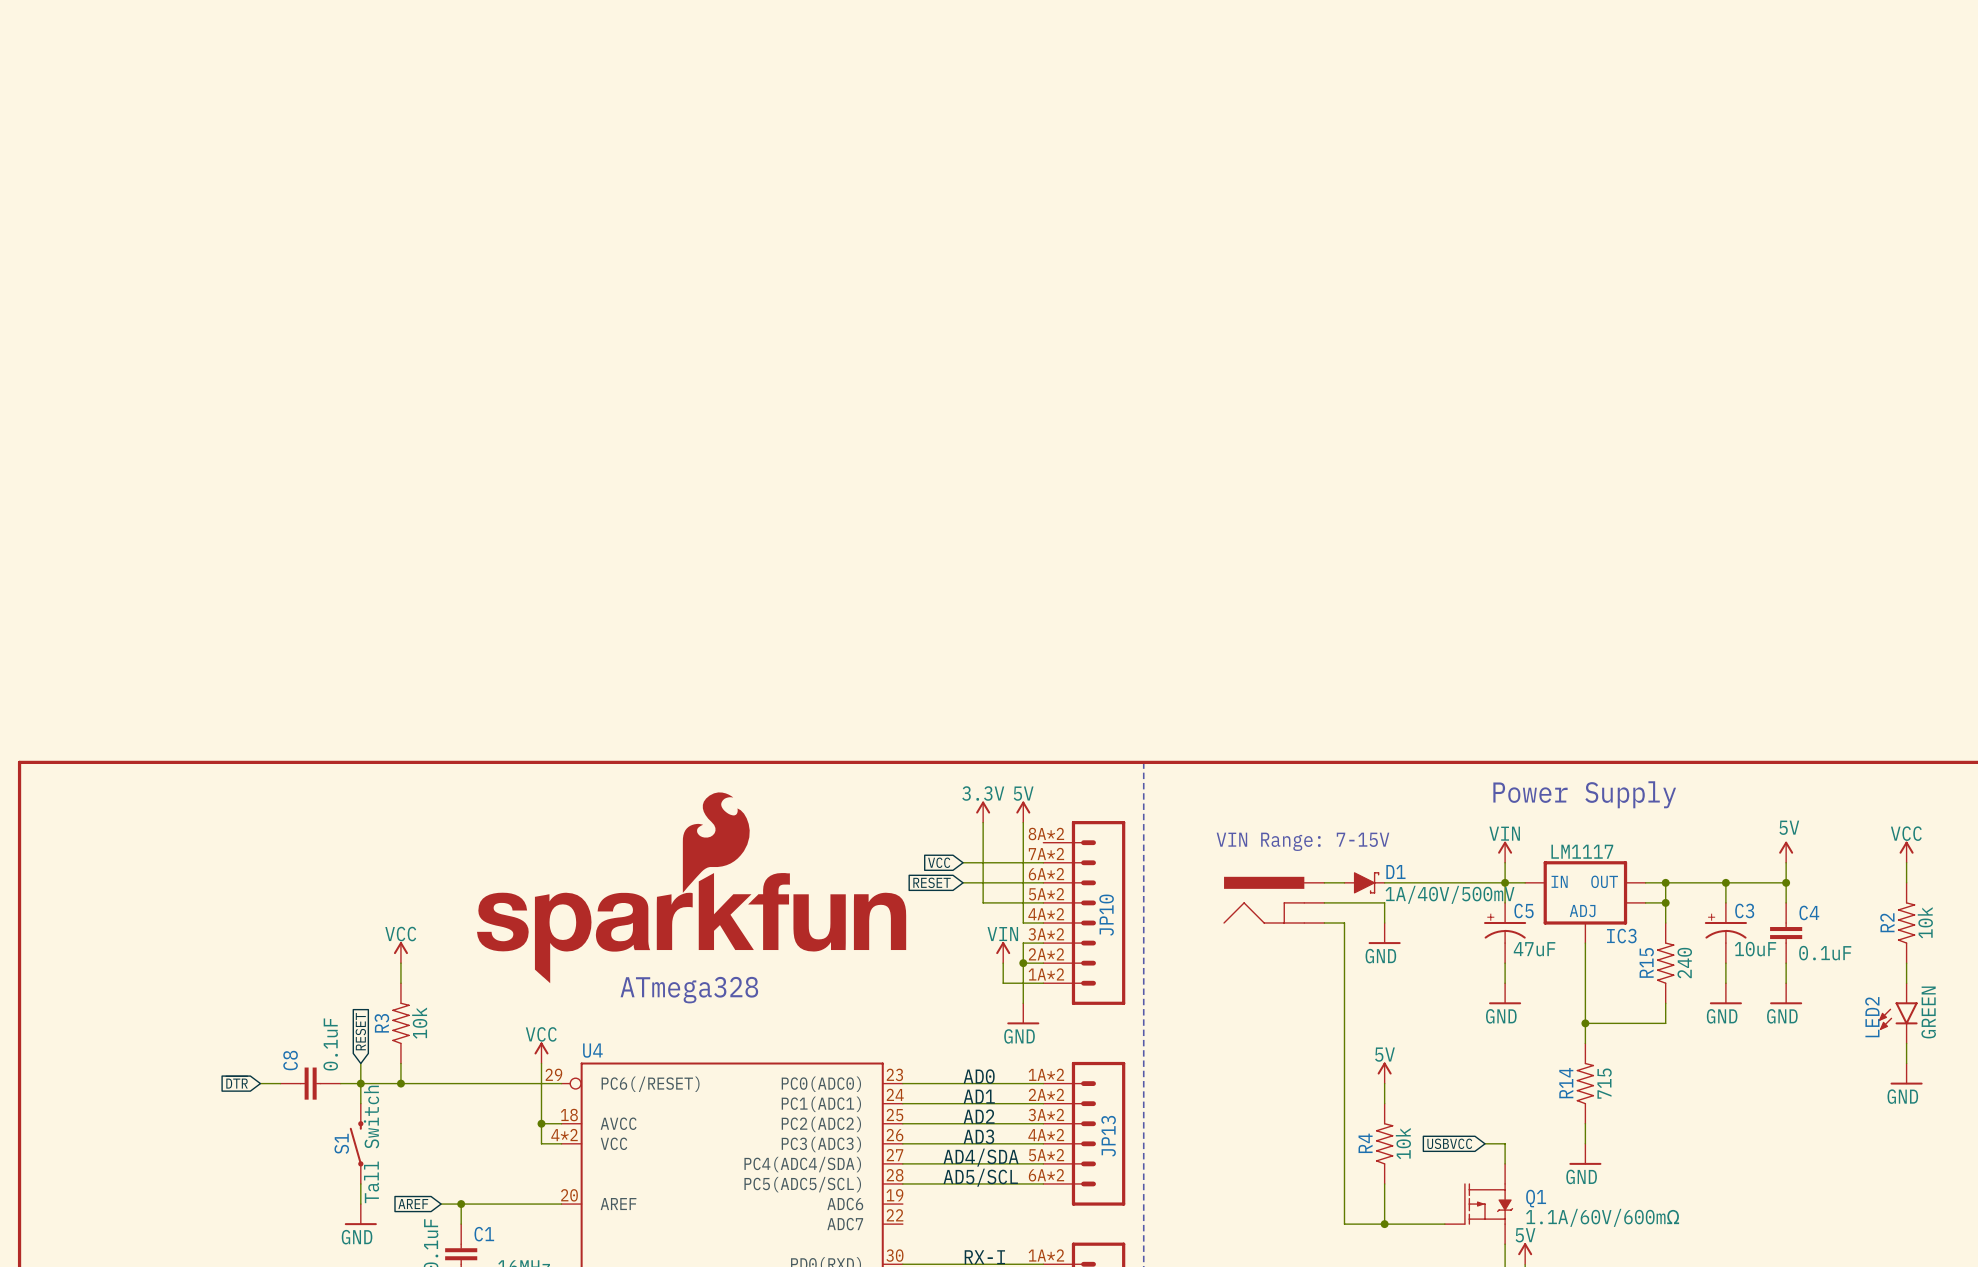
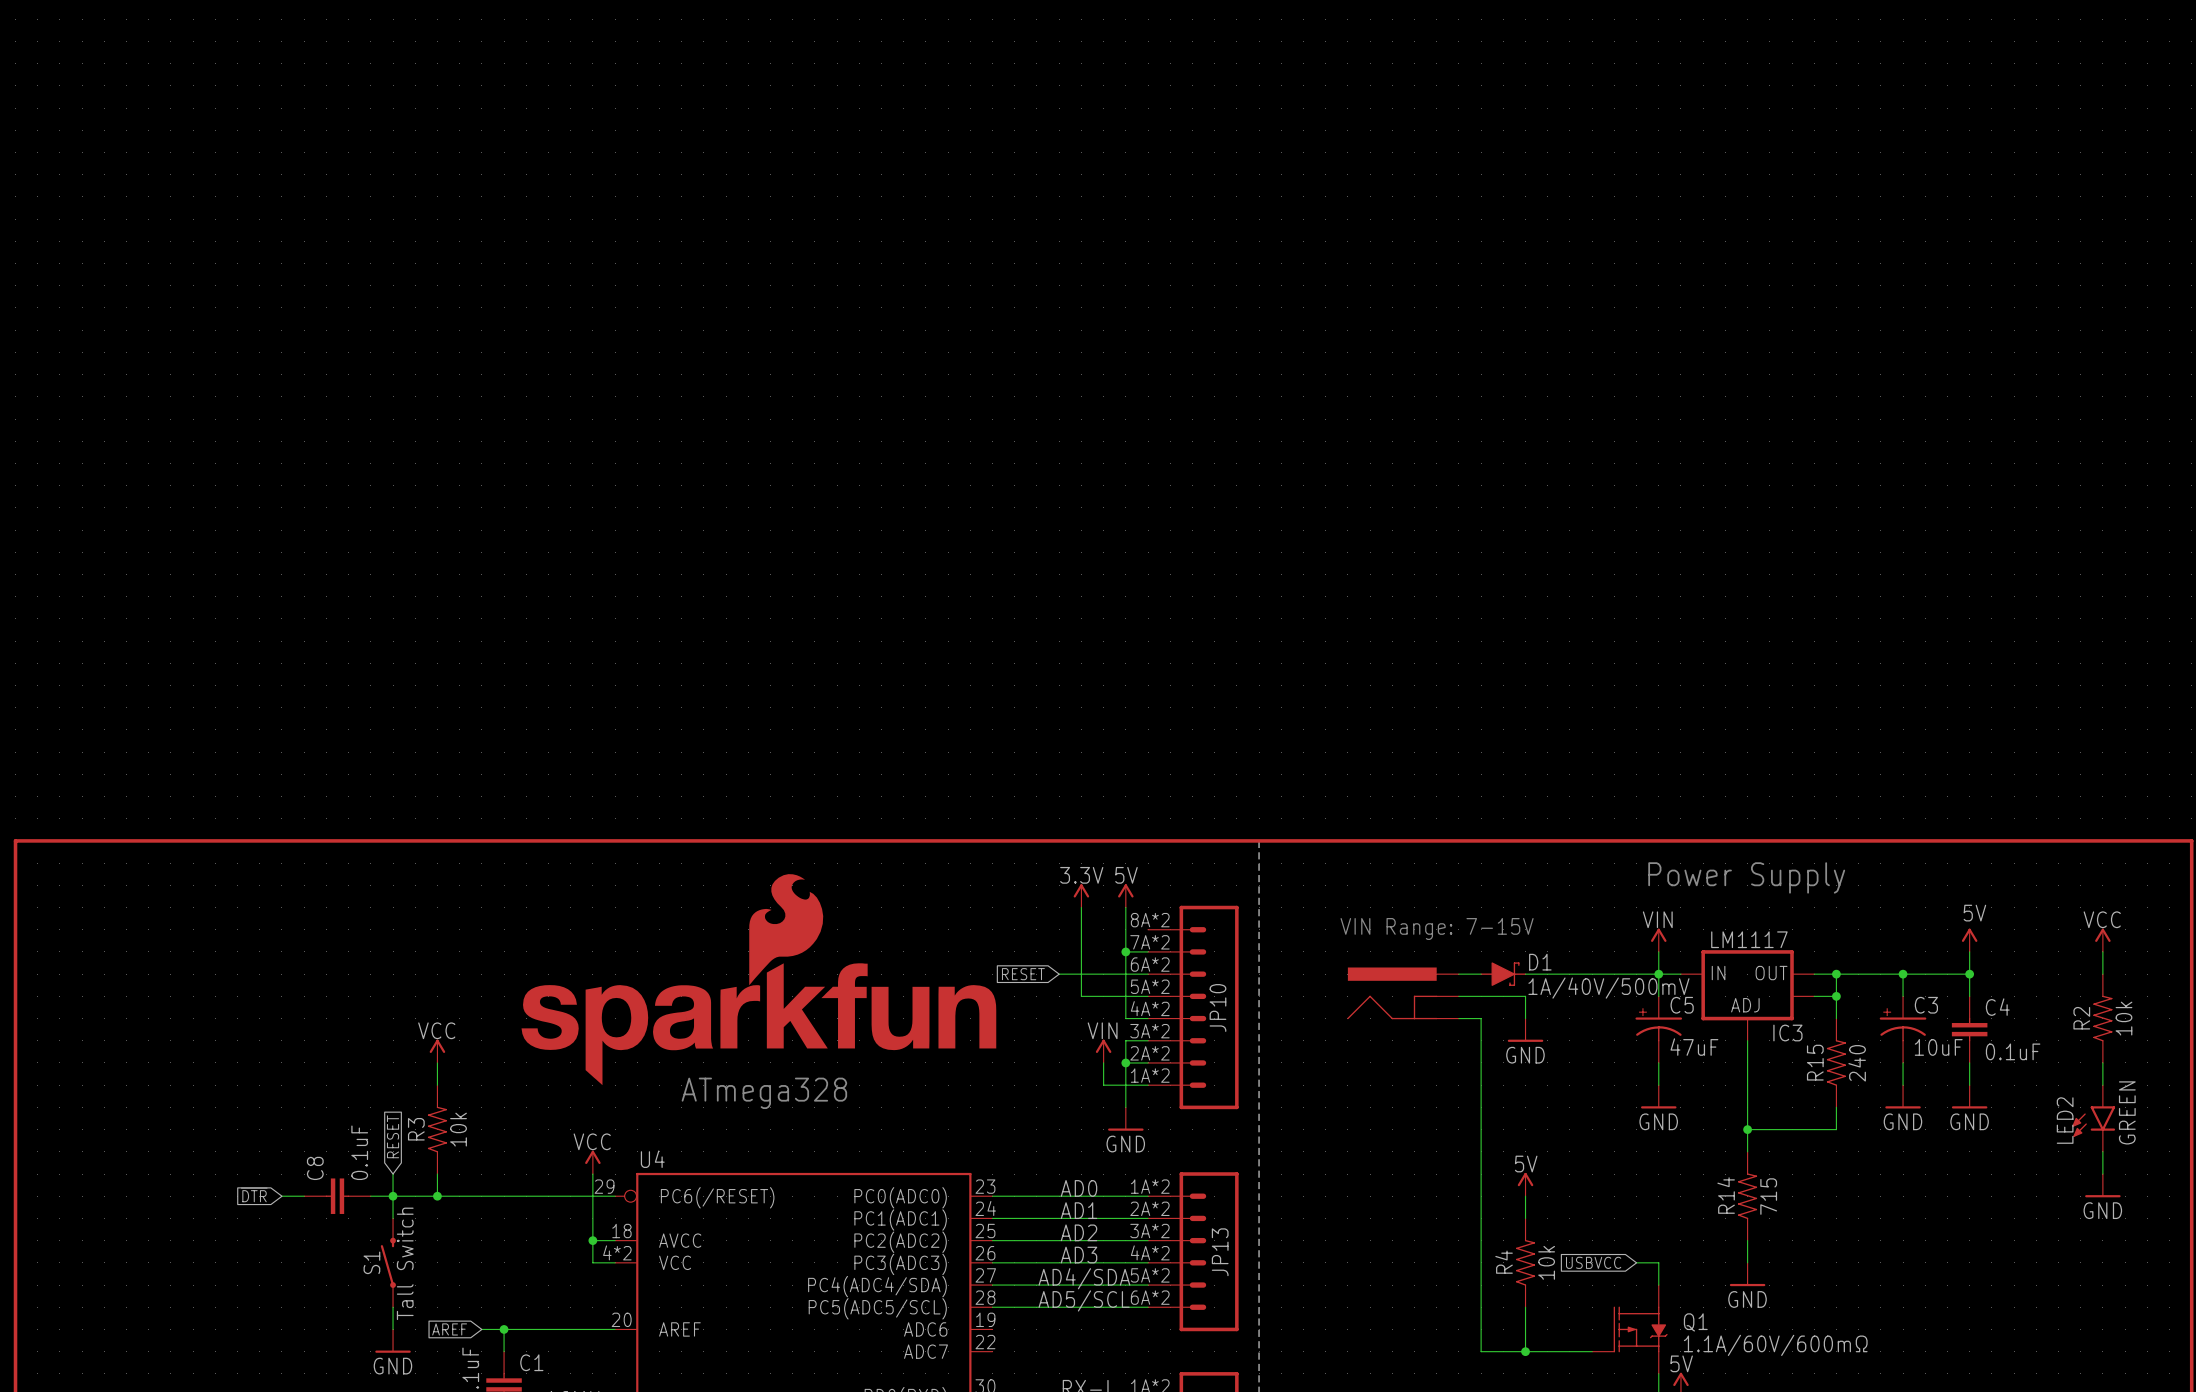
global label: VCC (939, 862) -> none
wire: (963, 862) (1023, 862) -> none
junction: none -> (1125, 951)

